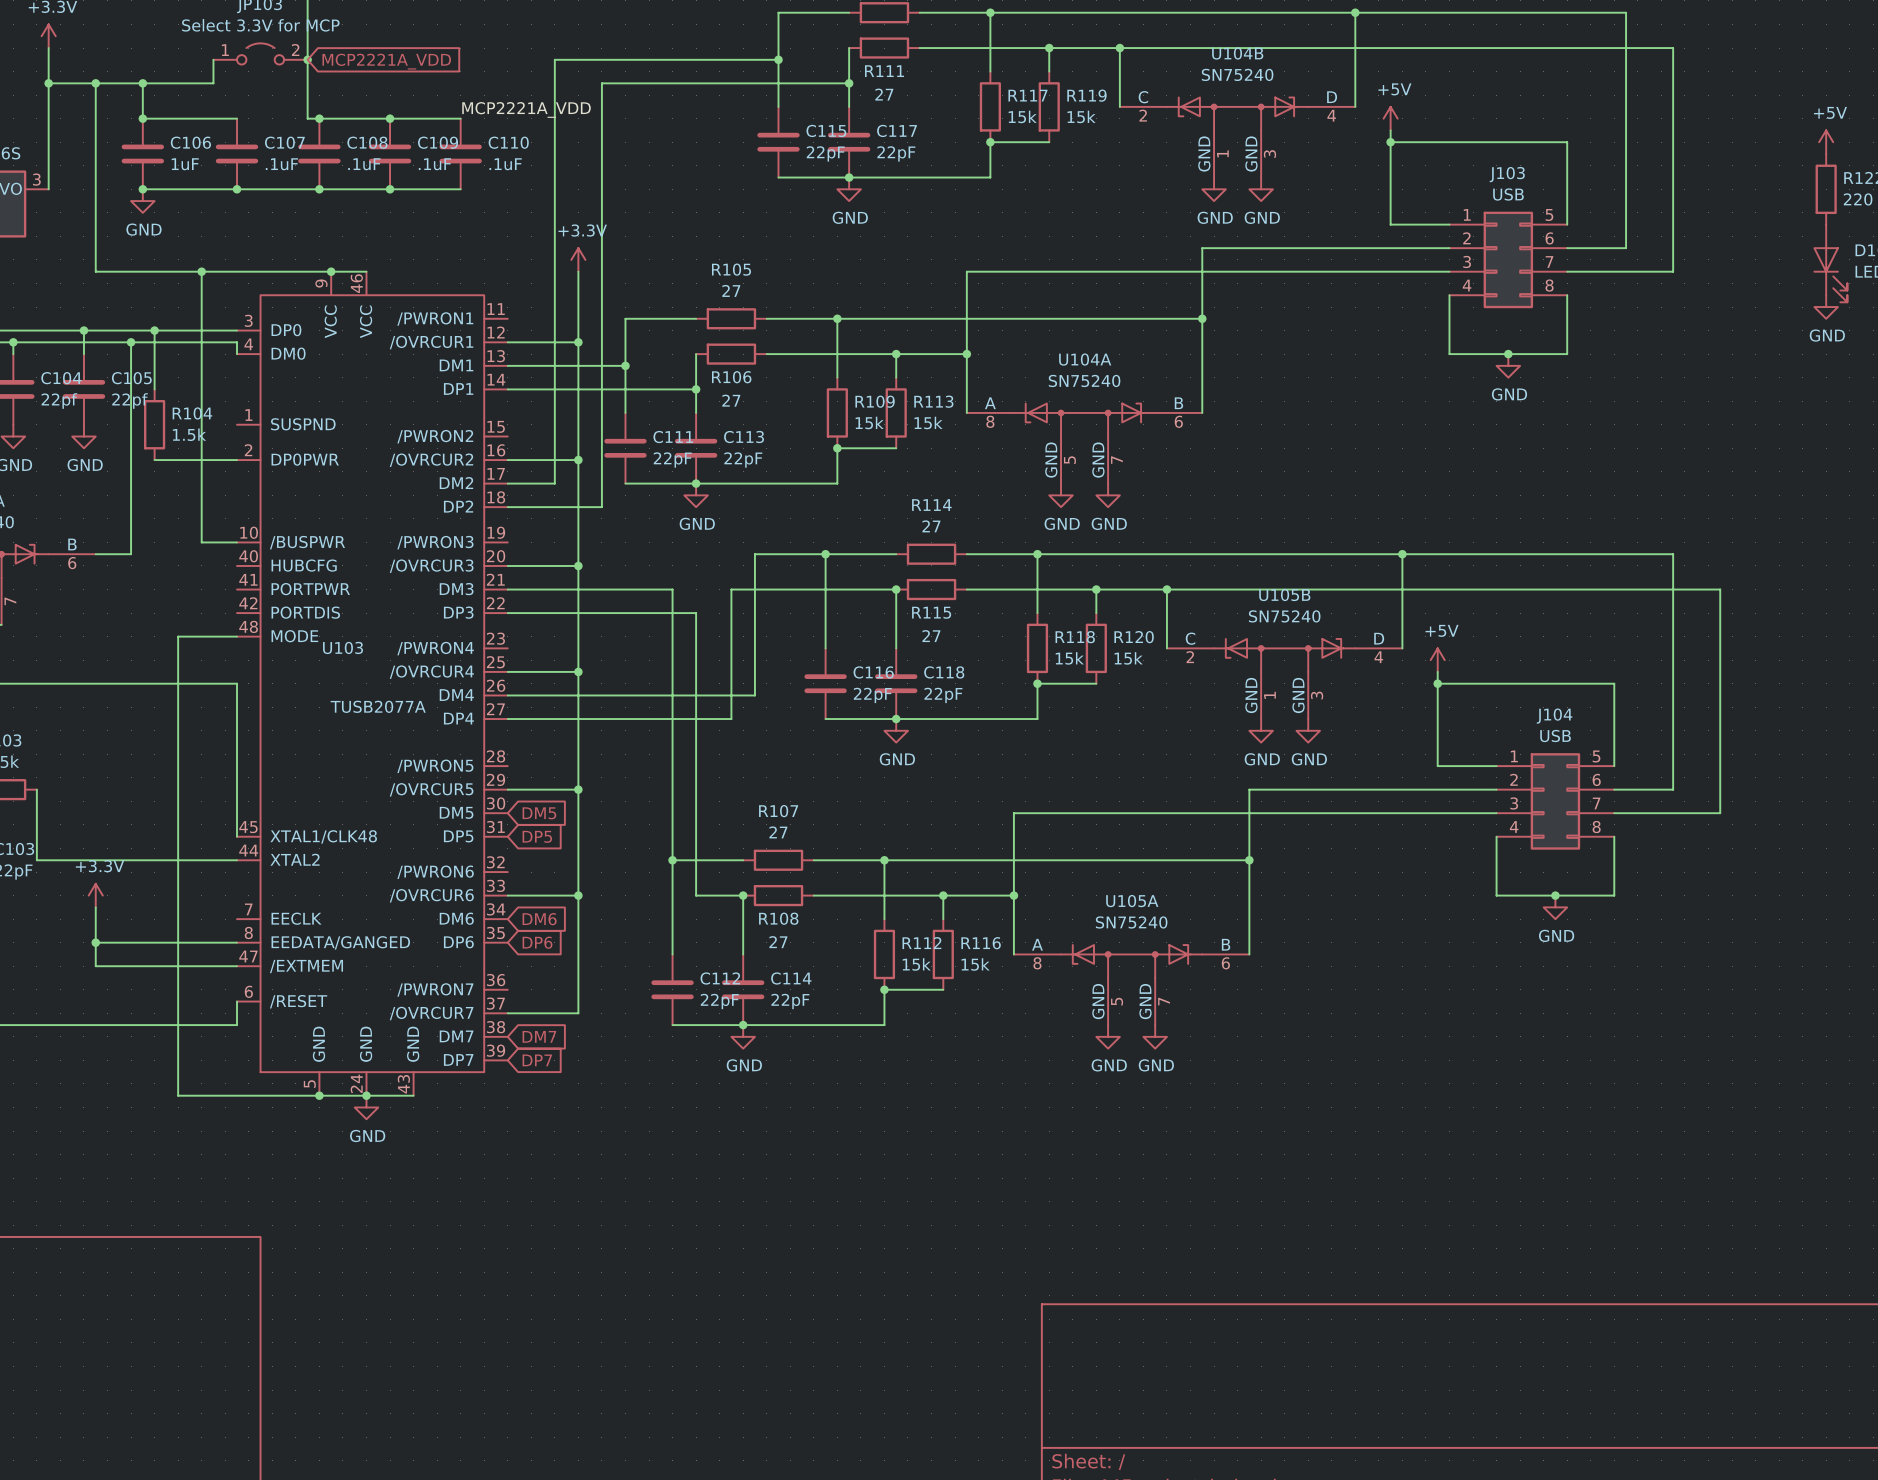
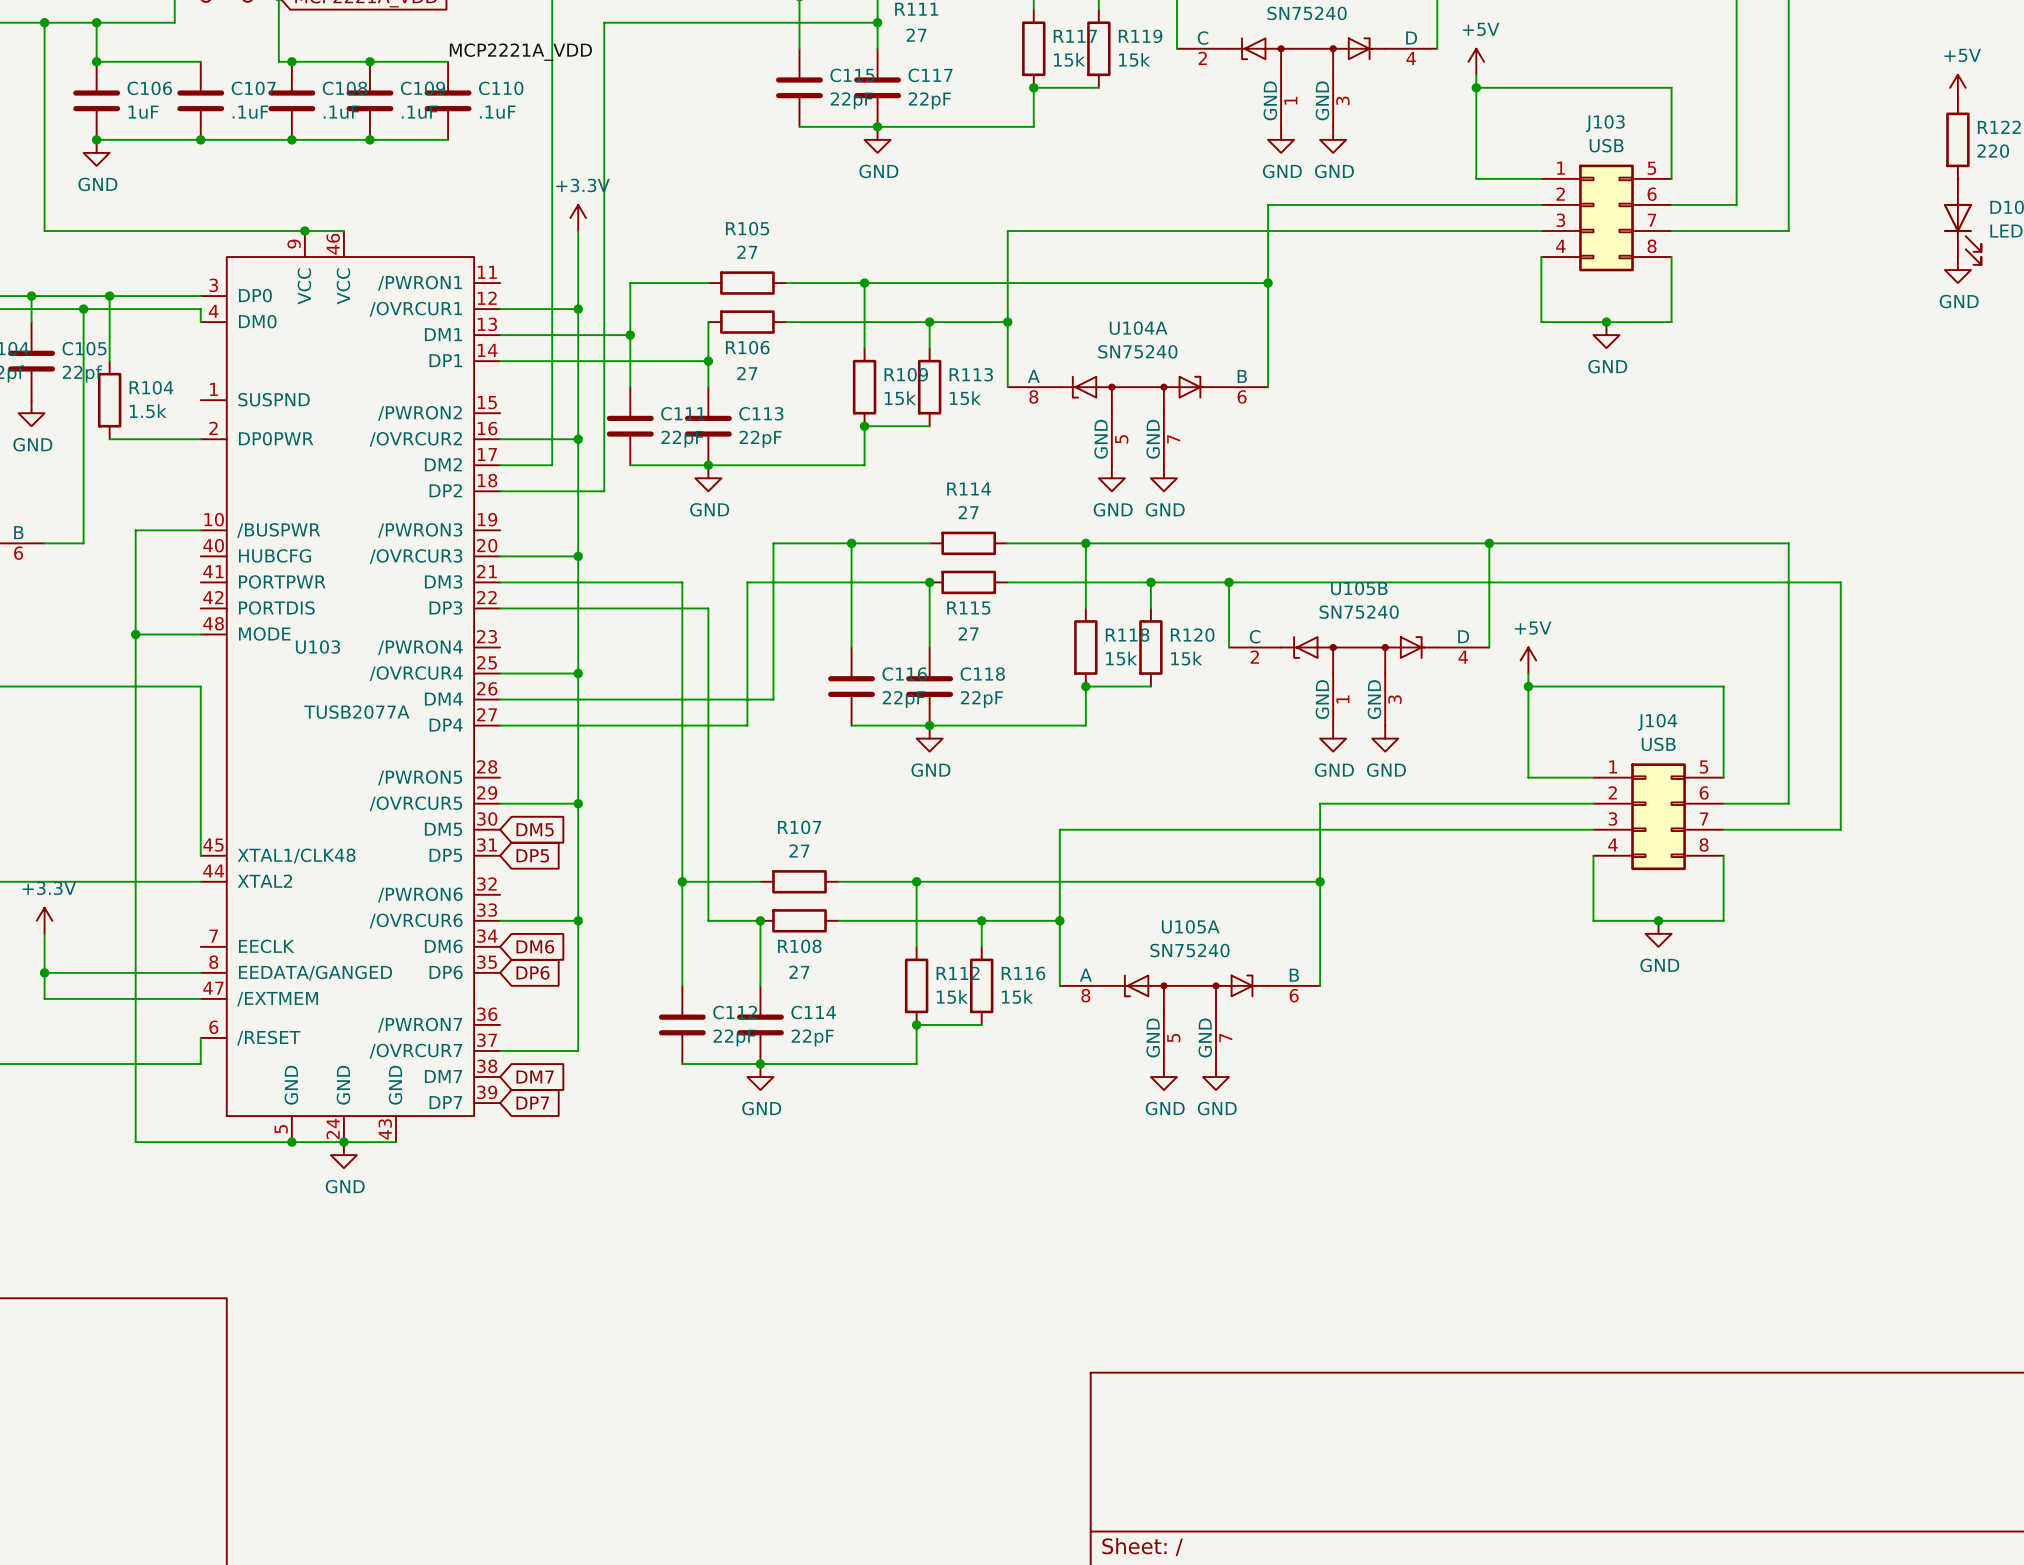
wire: (201, 271) (201, 542) -> (135, 634) (135, 530) (161, 530)
junction: (201, 271) -> none
junction: none -> (135, 634)

